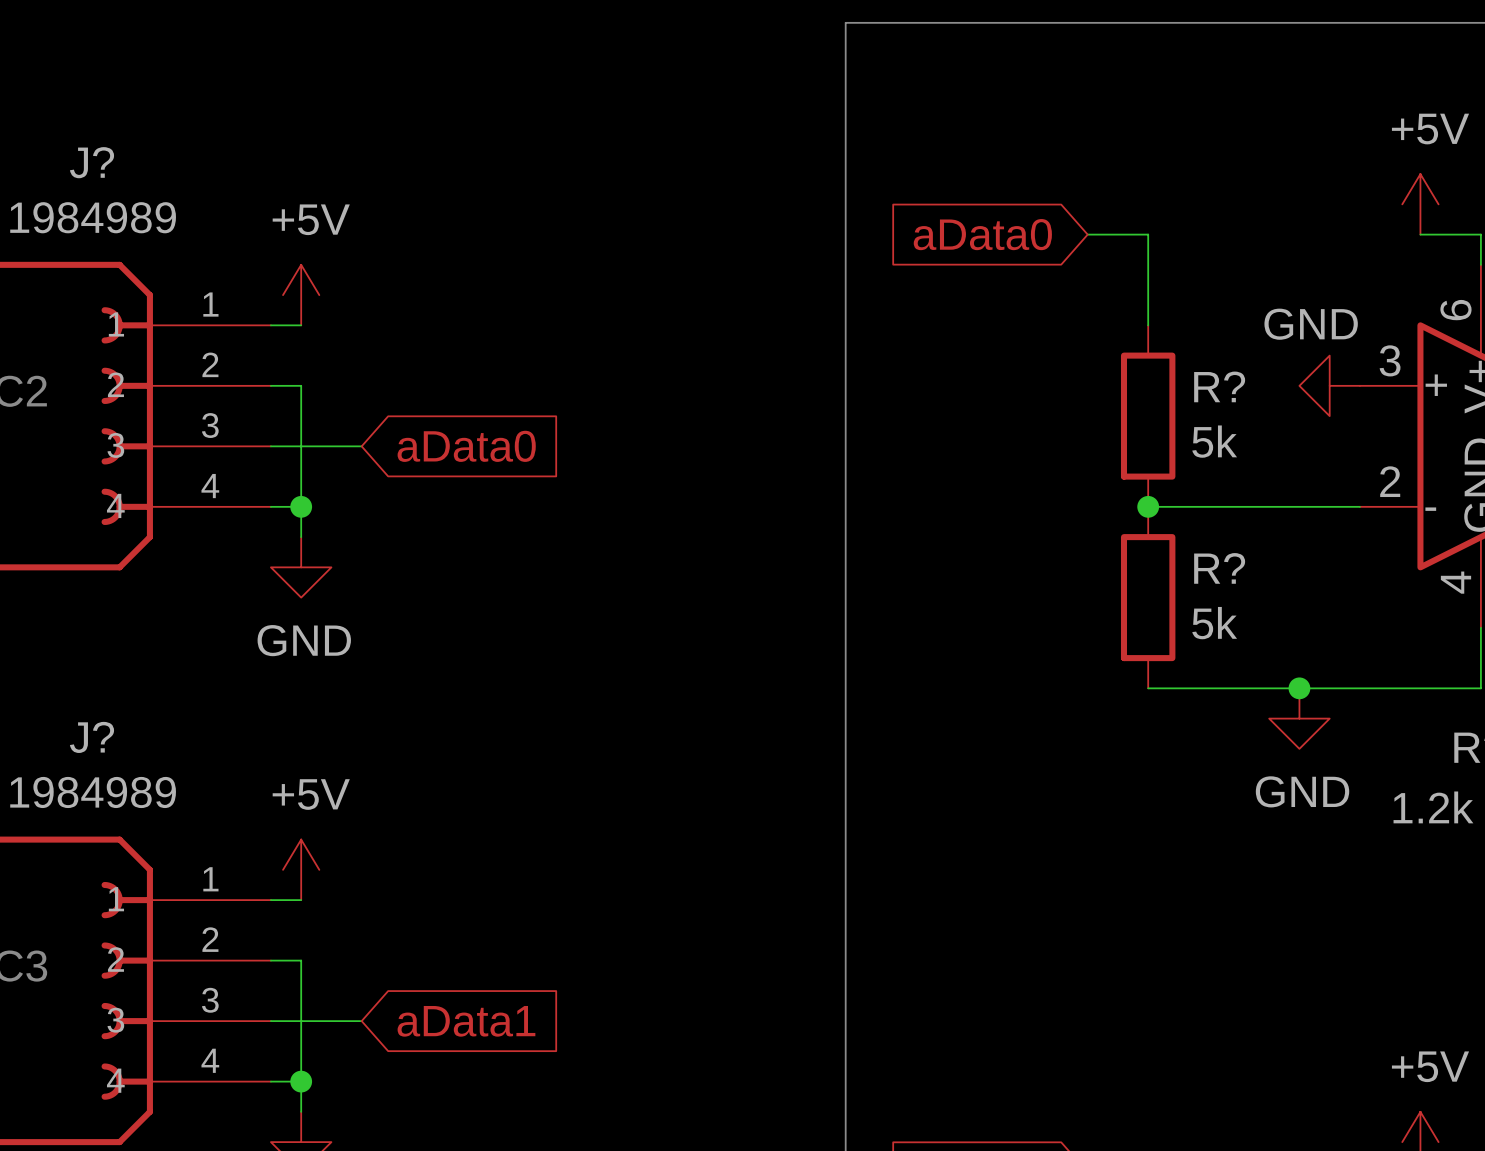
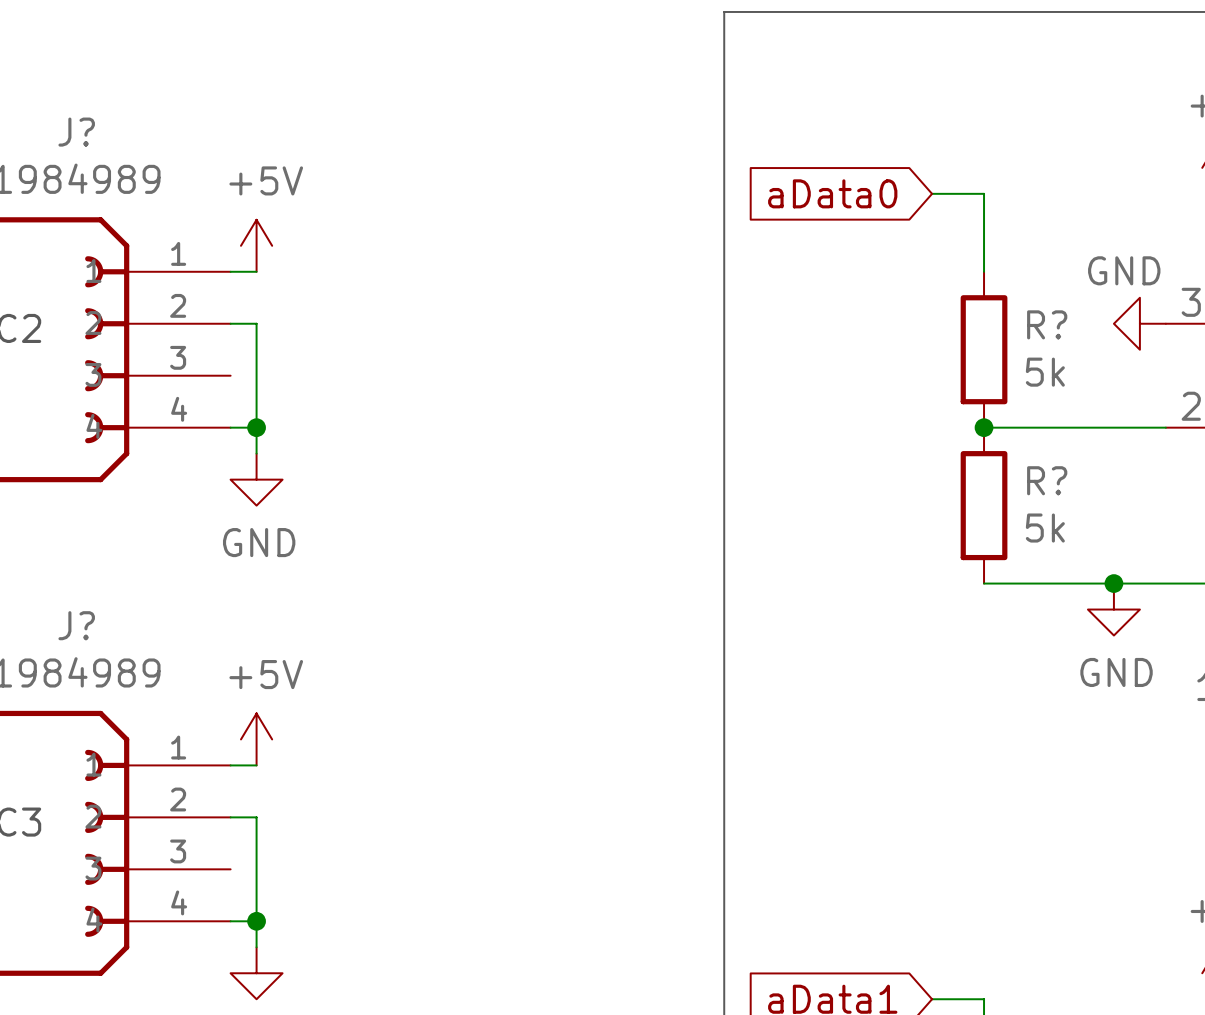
wire: (270, 446) (361, 446) -> none
global label: aData0 (466, 446) -> none
wire: (270, 1021) (361, 1021) -> none
global label: aData1 (466, 1021) -> none

